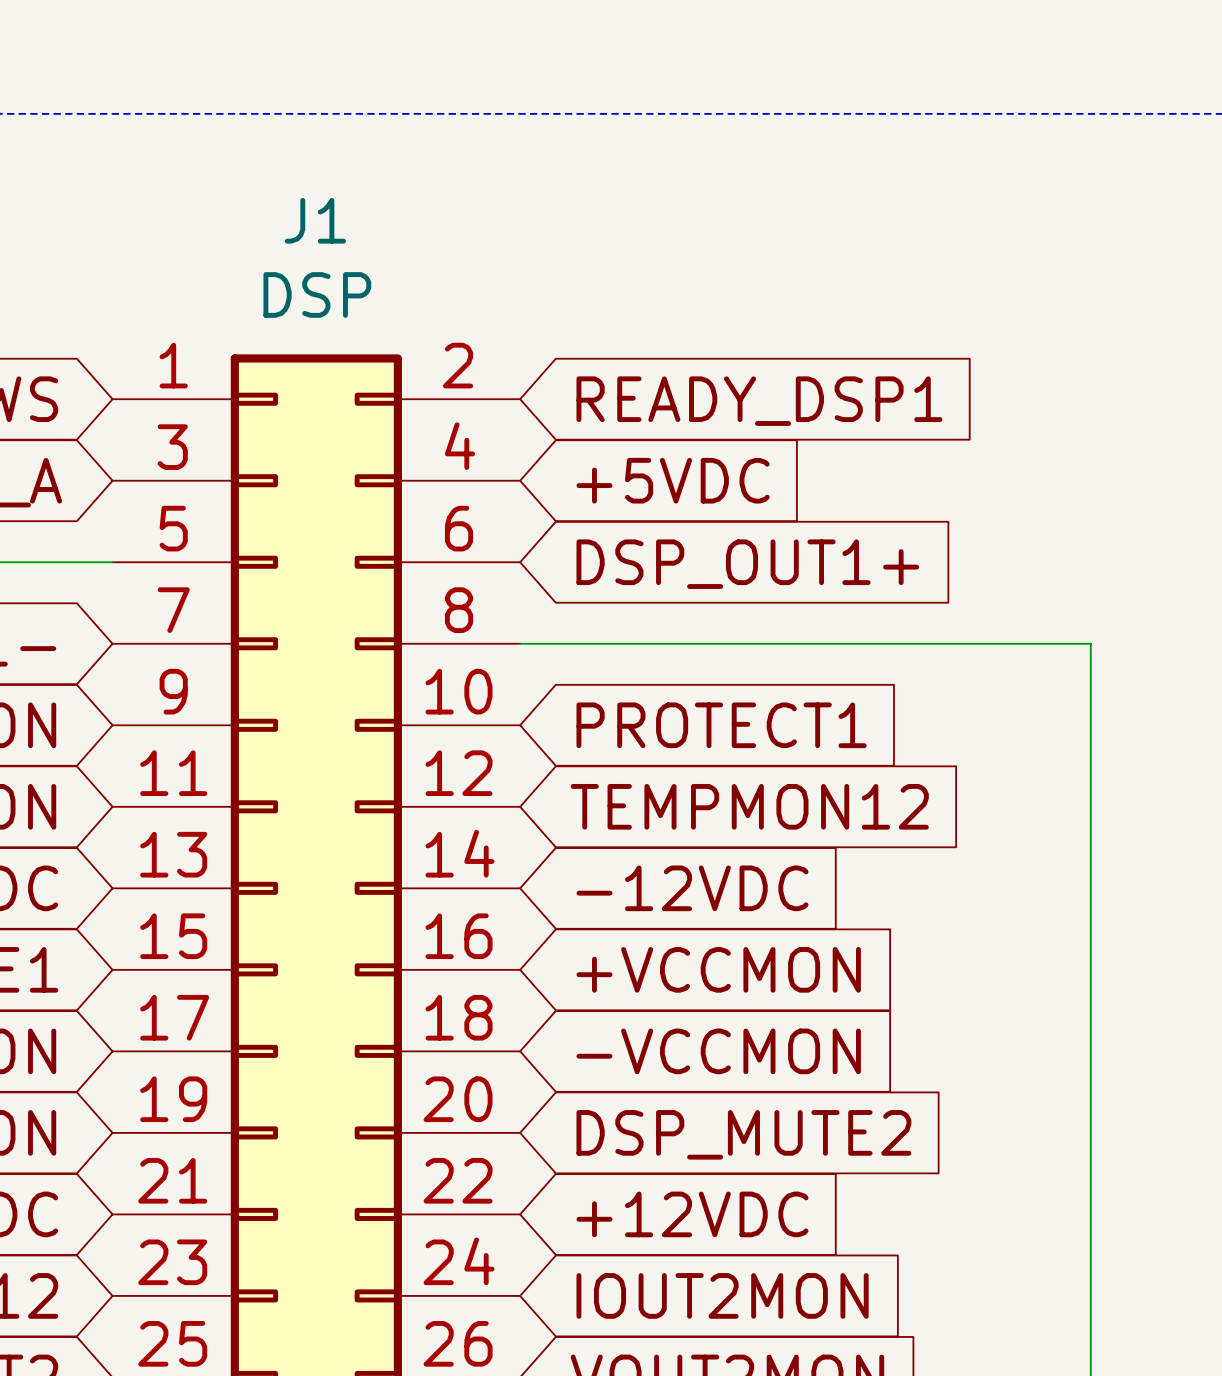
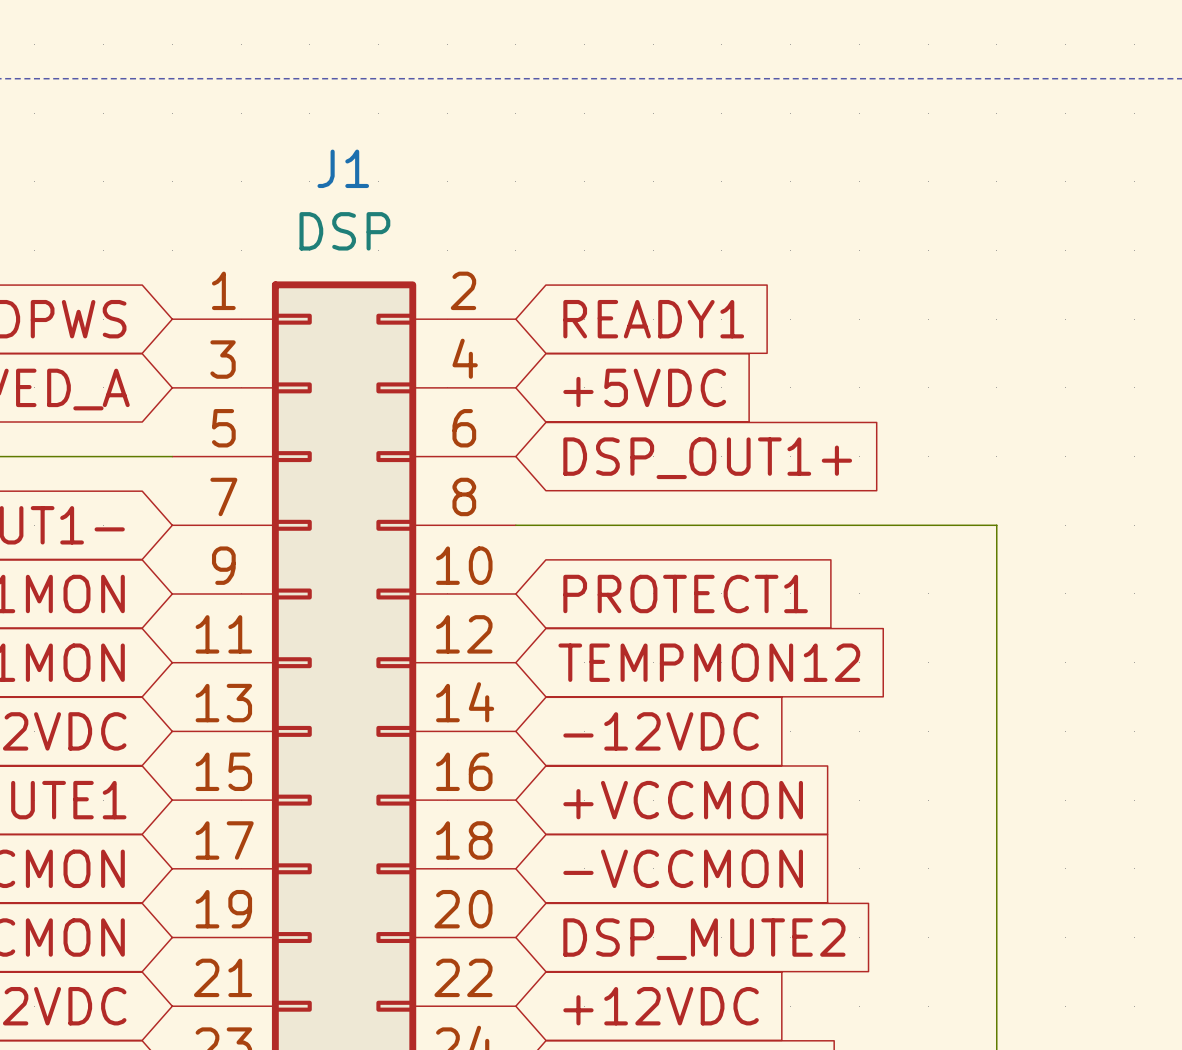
global label: READY_DSP1 (759, 401) -> READY1 (653, 319)

